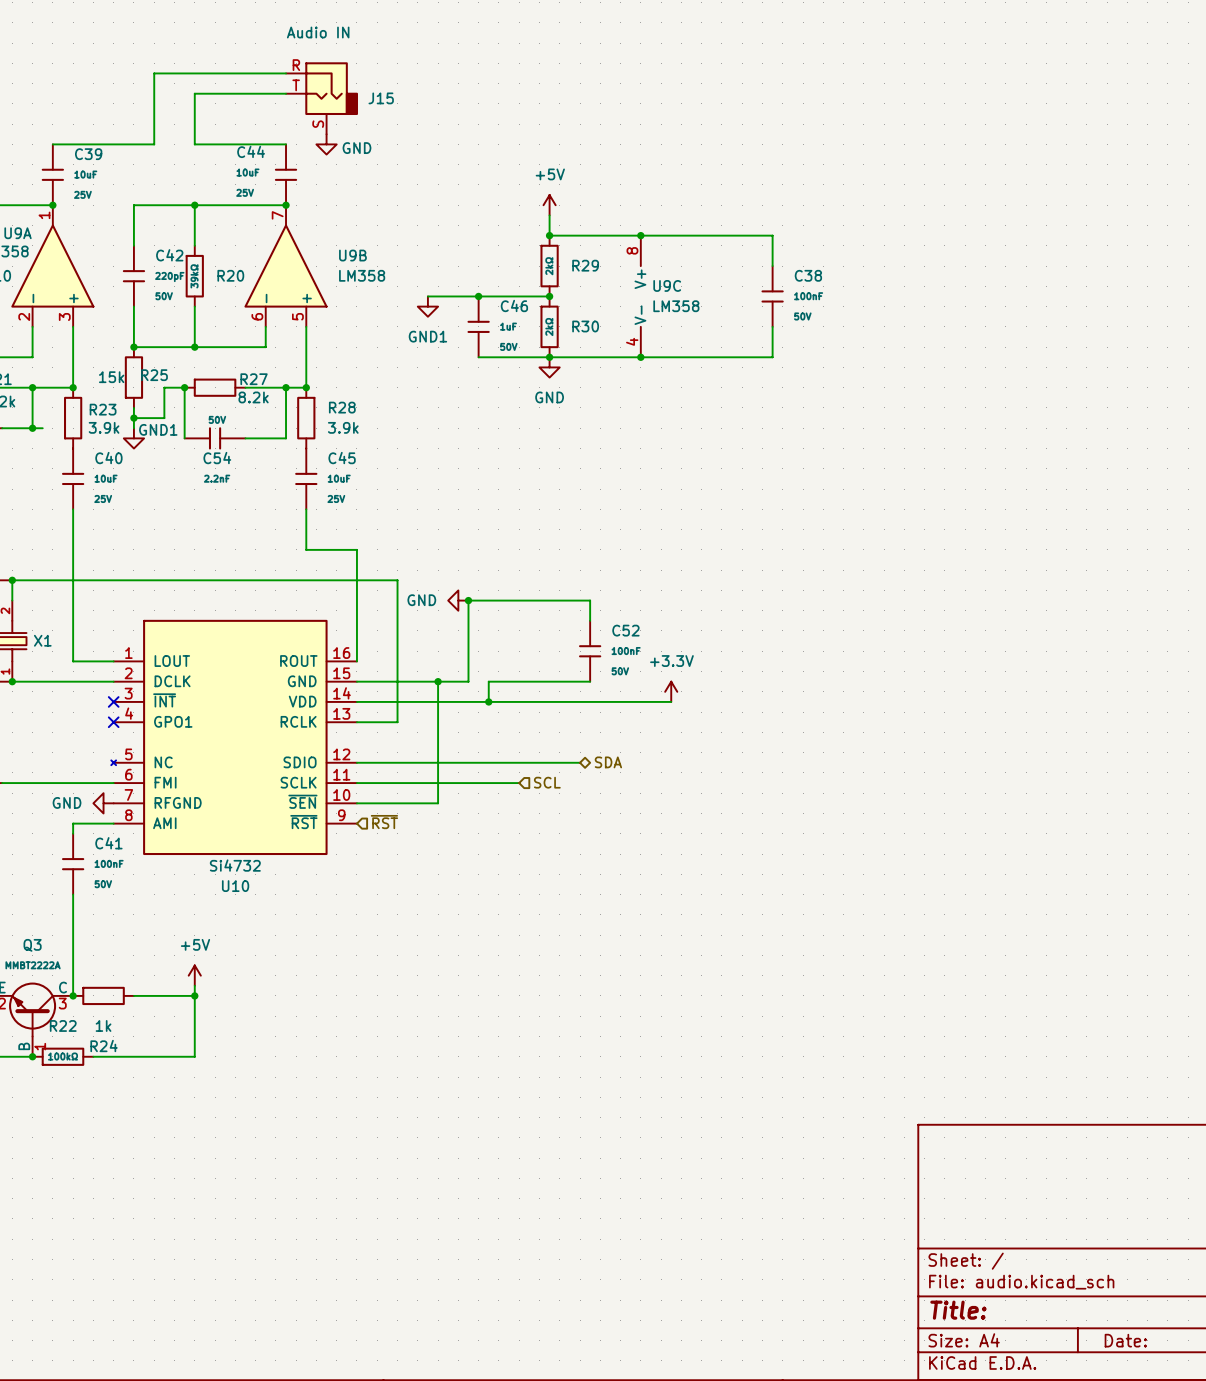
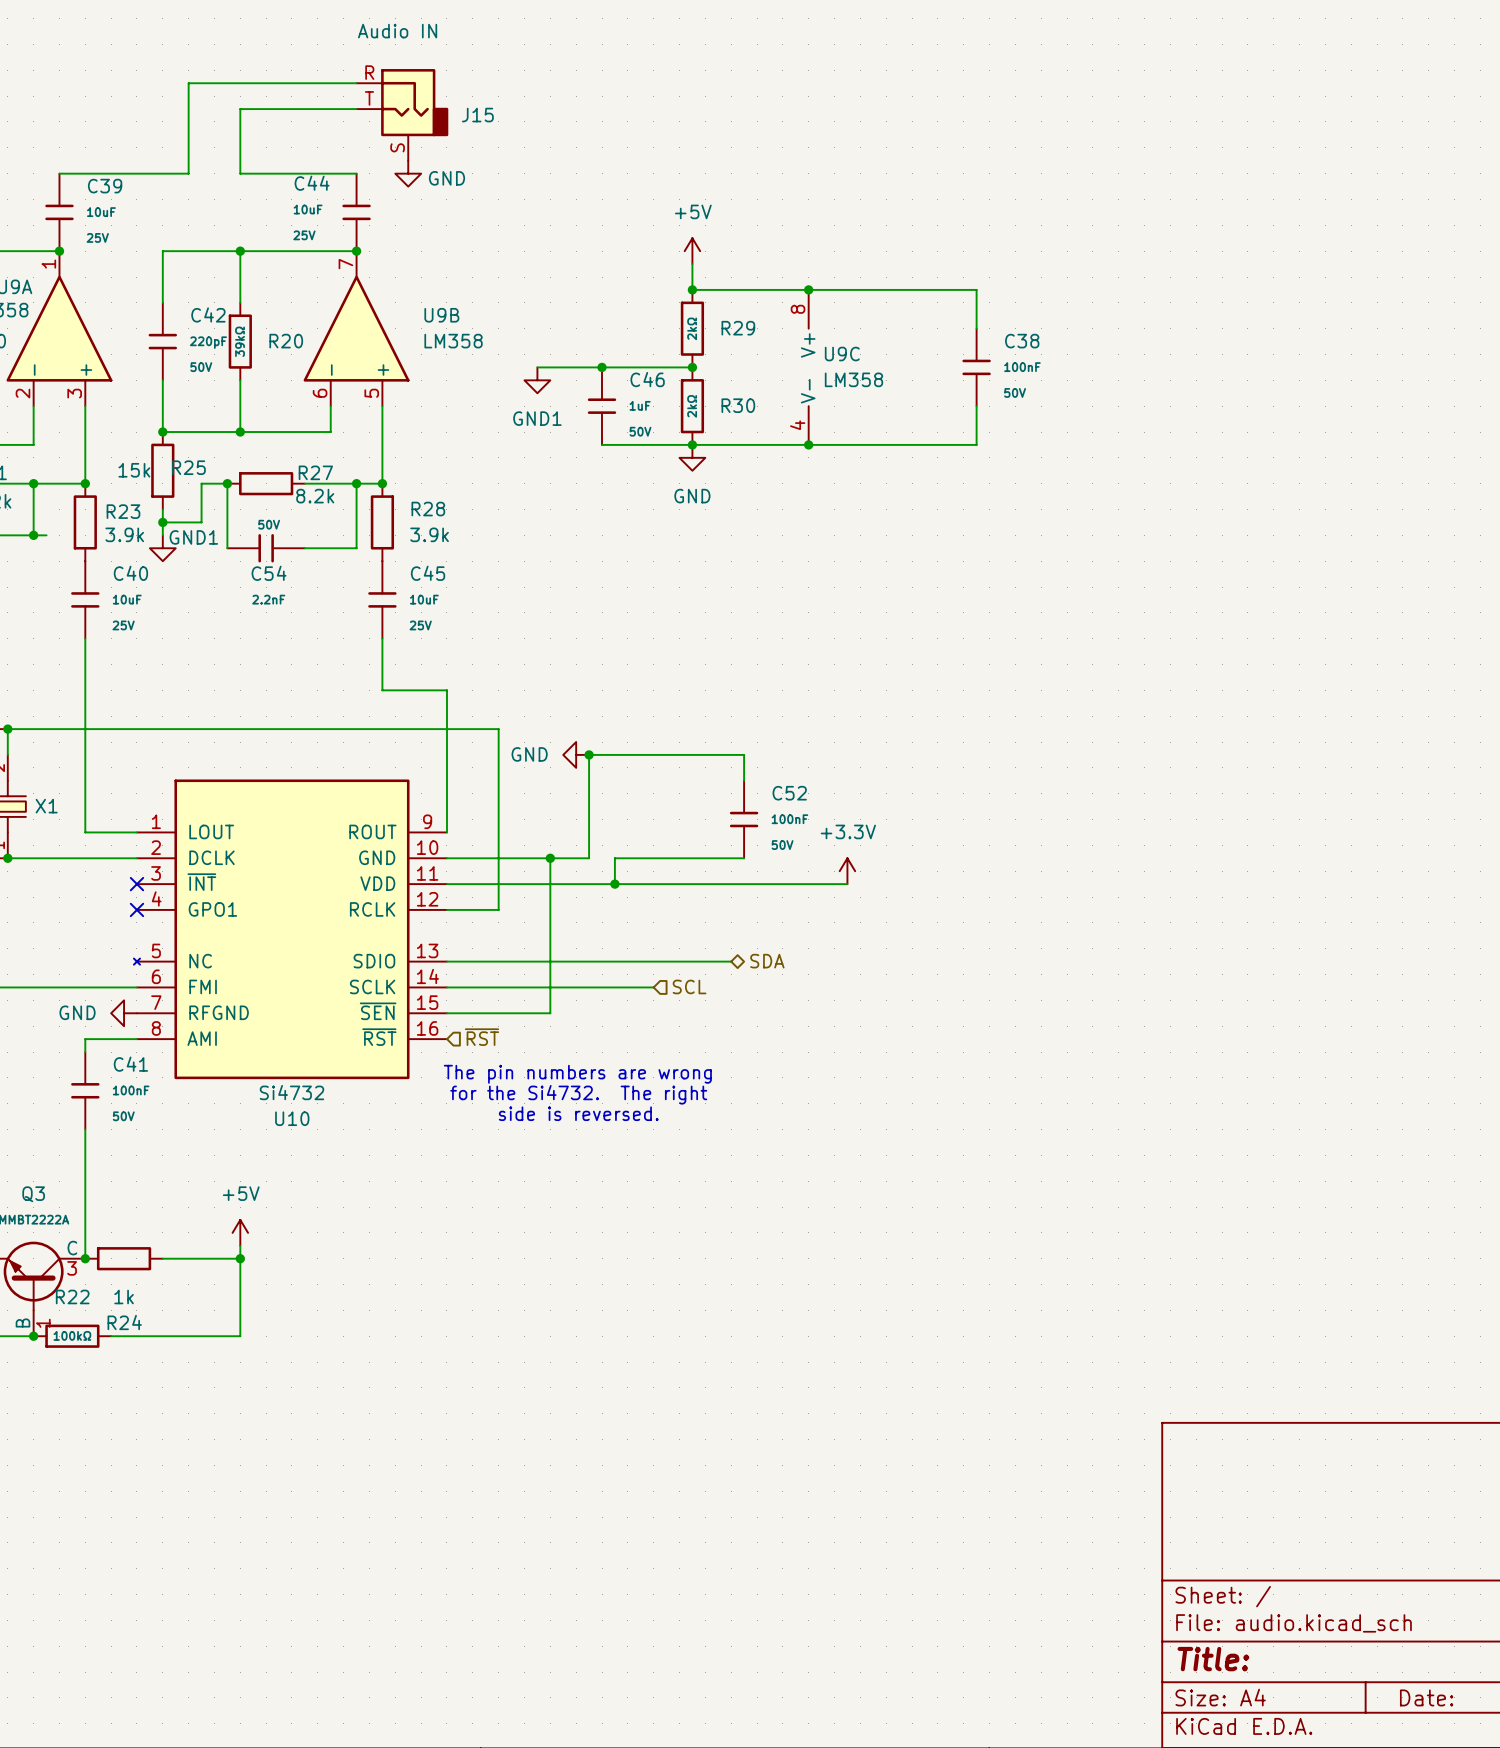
U10 pin number: 16 (341, 653) -> 9 (427, 821)
U10 pin number: 15 (341, 673) -> 10 (427, 847)
U10 pin number: 14 (342, 693) -> 11 (427, 873)
U10 pin number: 13 (341, 713) -> 12 (427, 899)
U10 pin number: 12 (341, 754) -> 13 (427, 950)
U10 pin number: 11 (341, 774) -> 14 (427, 976)
U10 pin number: 10 (341, 794) -> 15 (427, 1002)
U10 pin number: 9 (341, 815) -> 16 (427, 1028)
text: none -> The pin numbers are wrong (577, 1074)
text: none -> for the Si4732. The right (578, 1094)
text: none -> side is reversed. (578, 1113)

